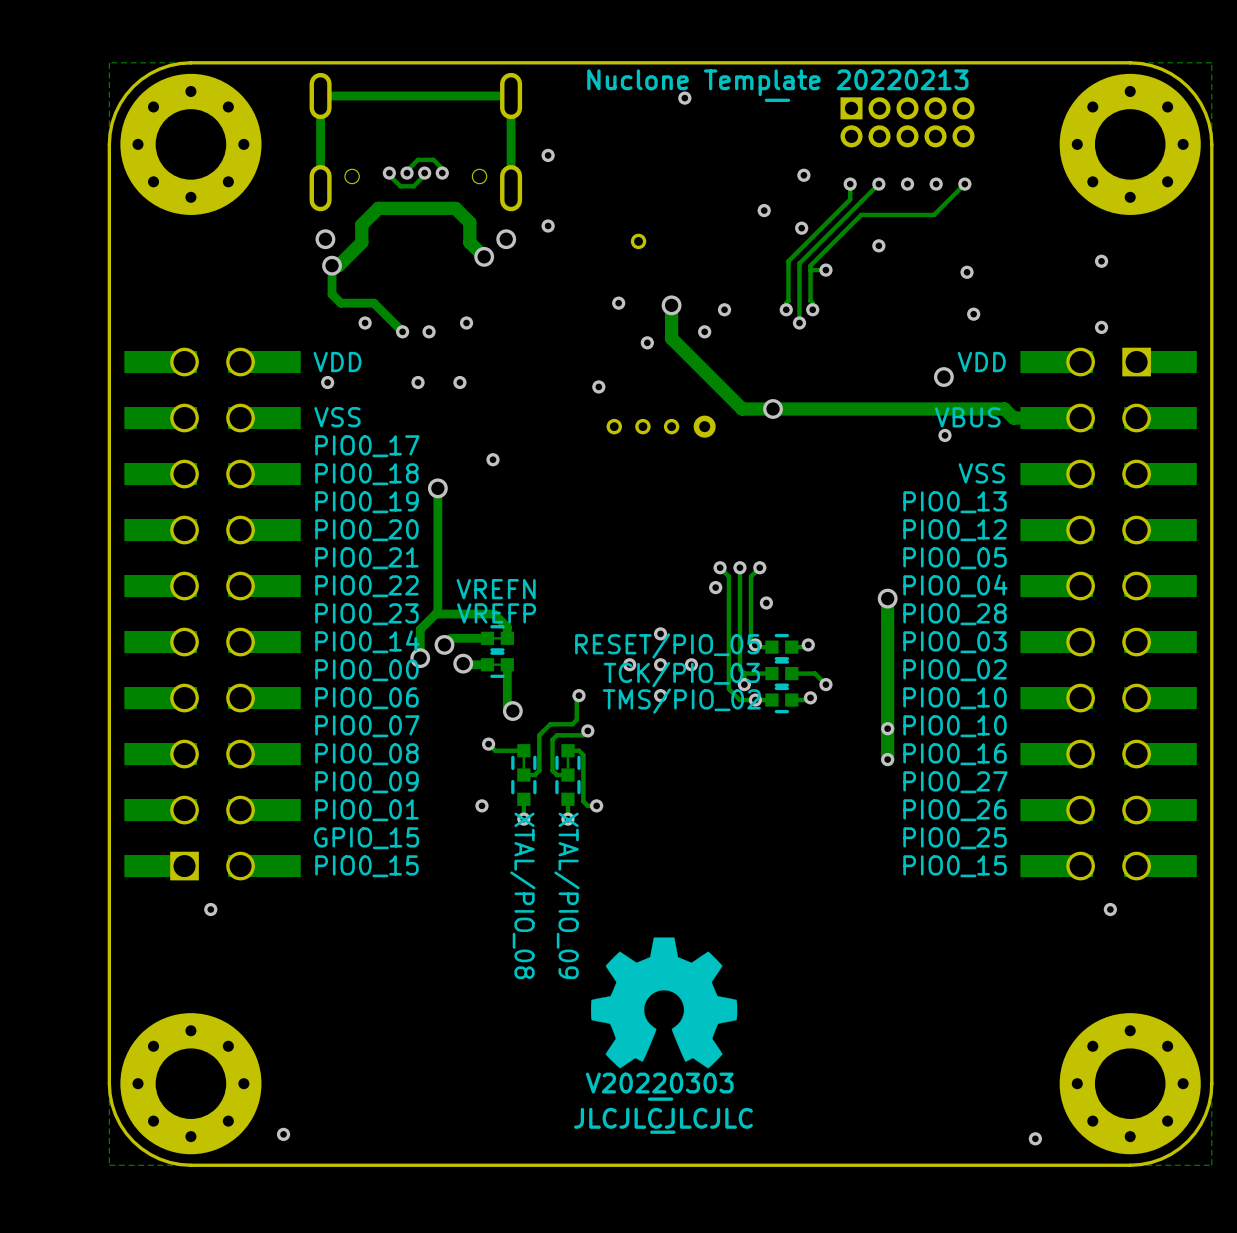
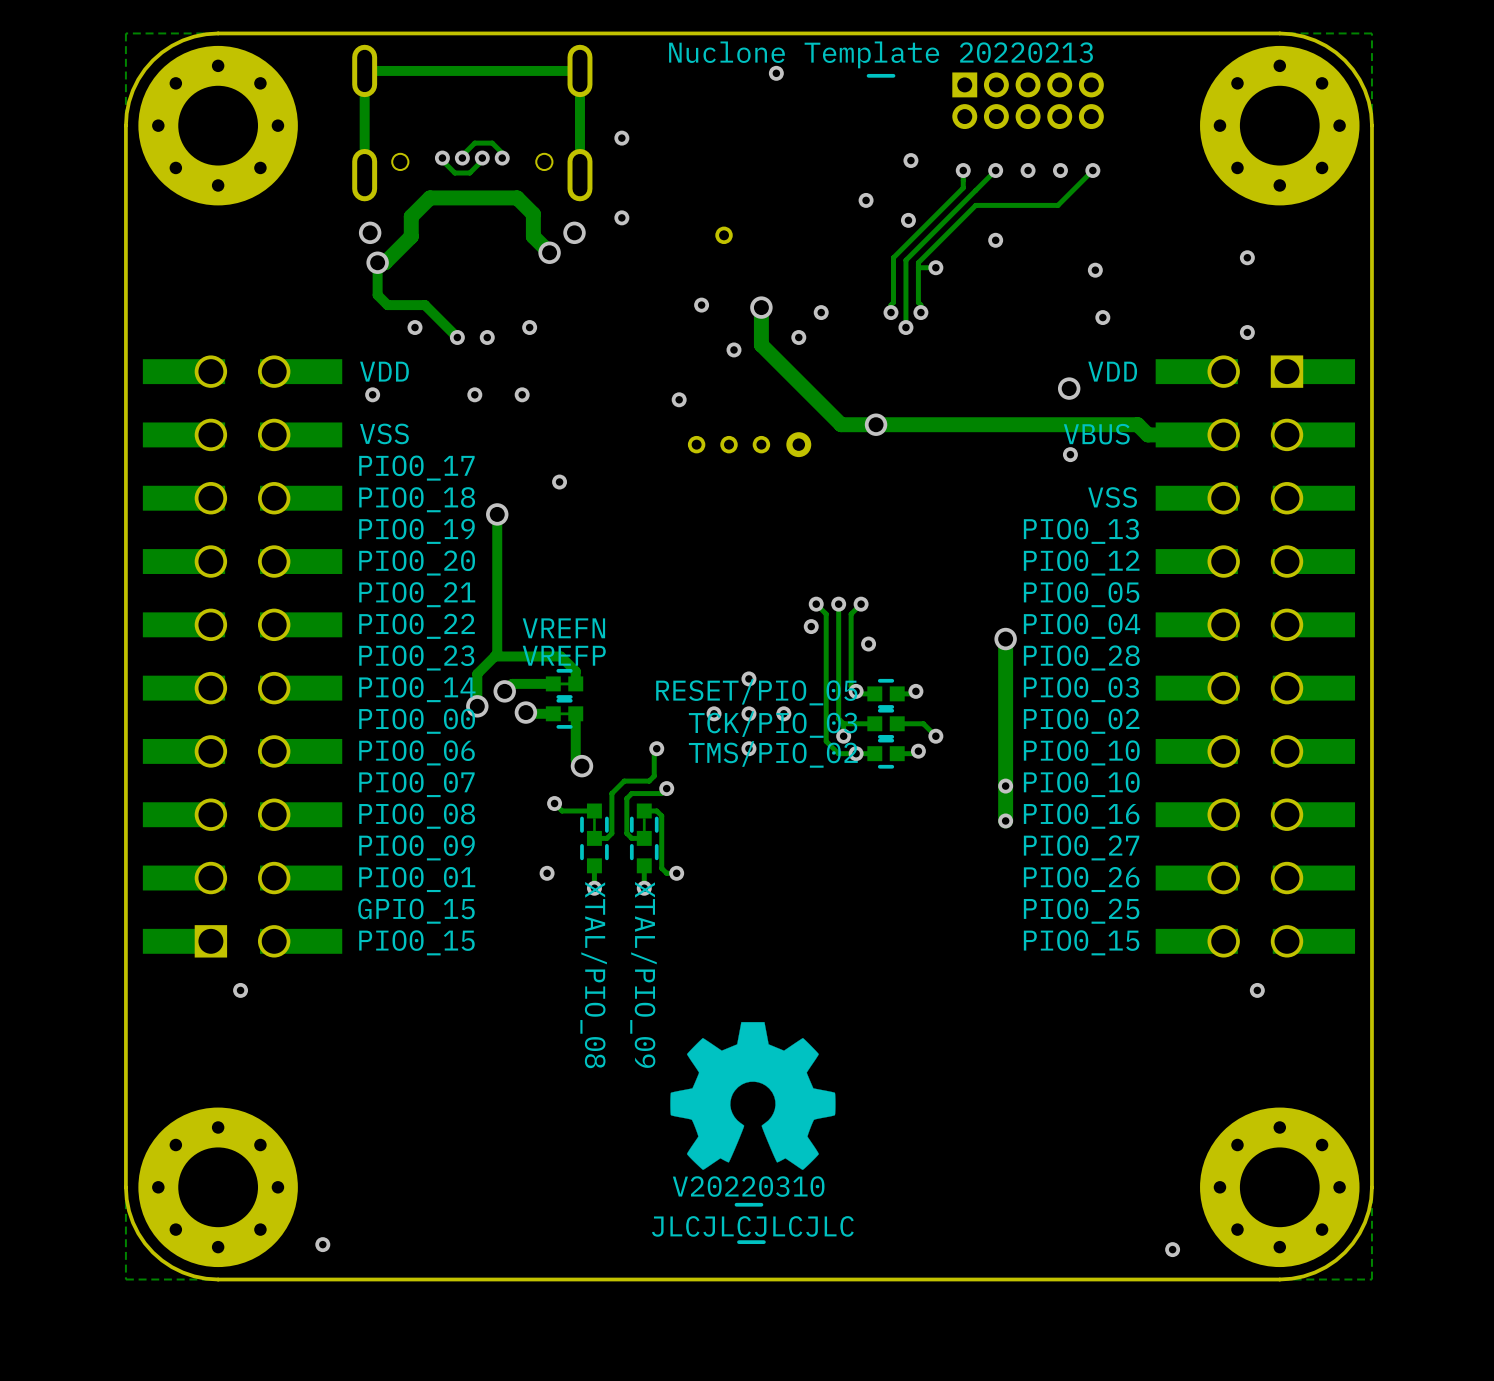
drawing shape: [585, 1072, 734, 1101] -> [672, 1176, 825, 1207]

